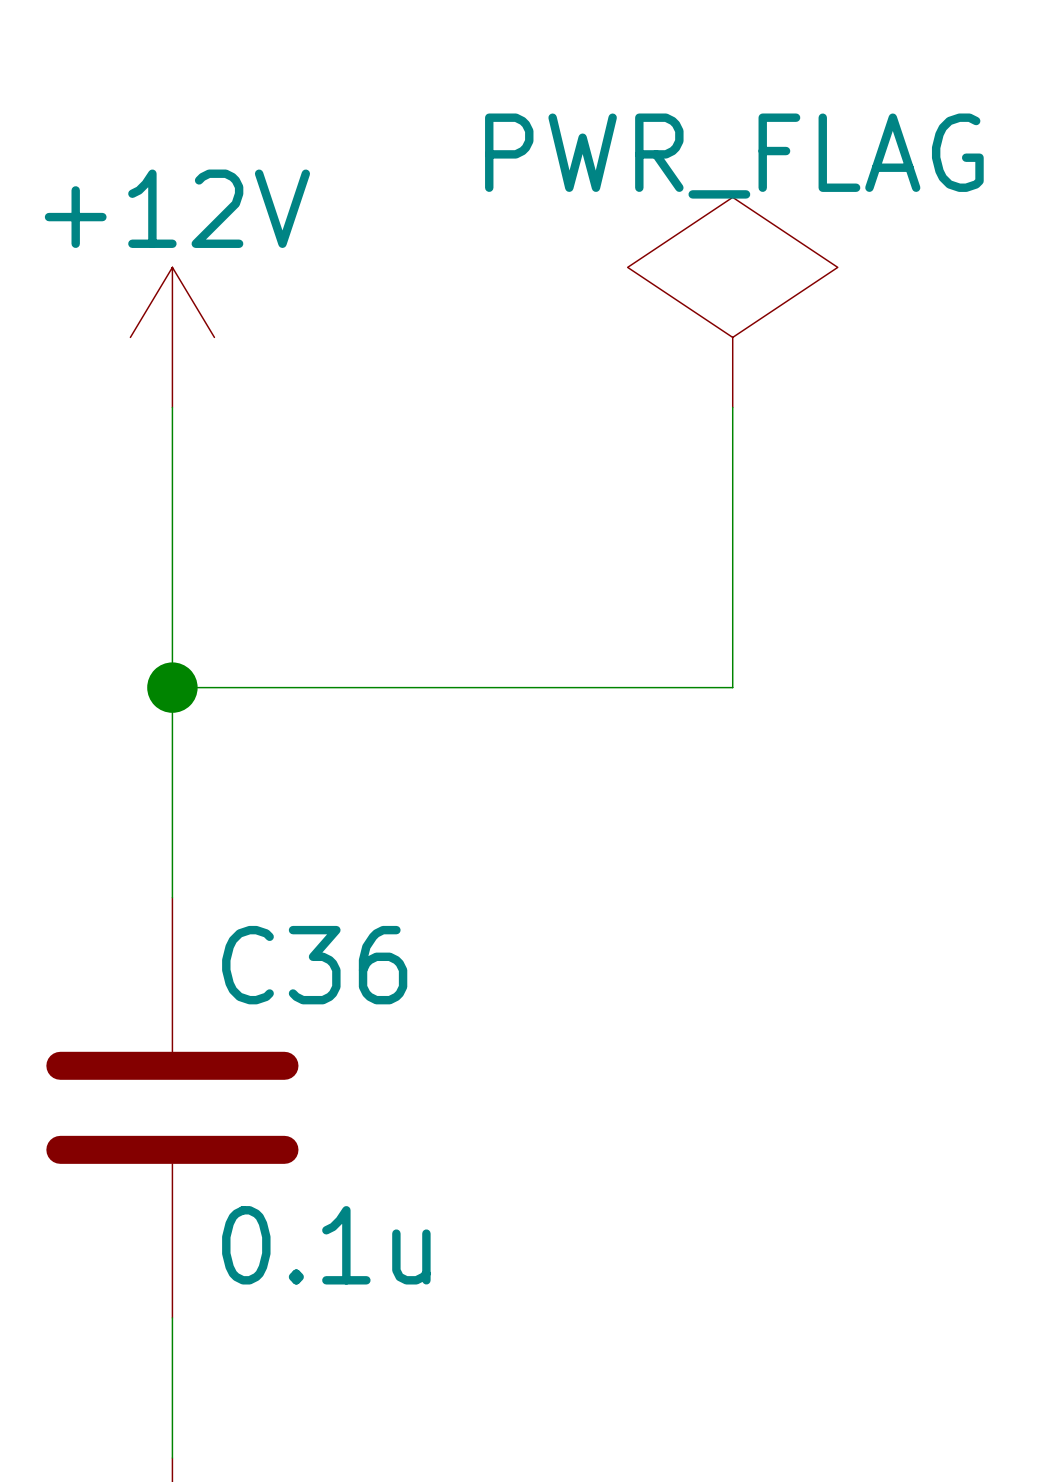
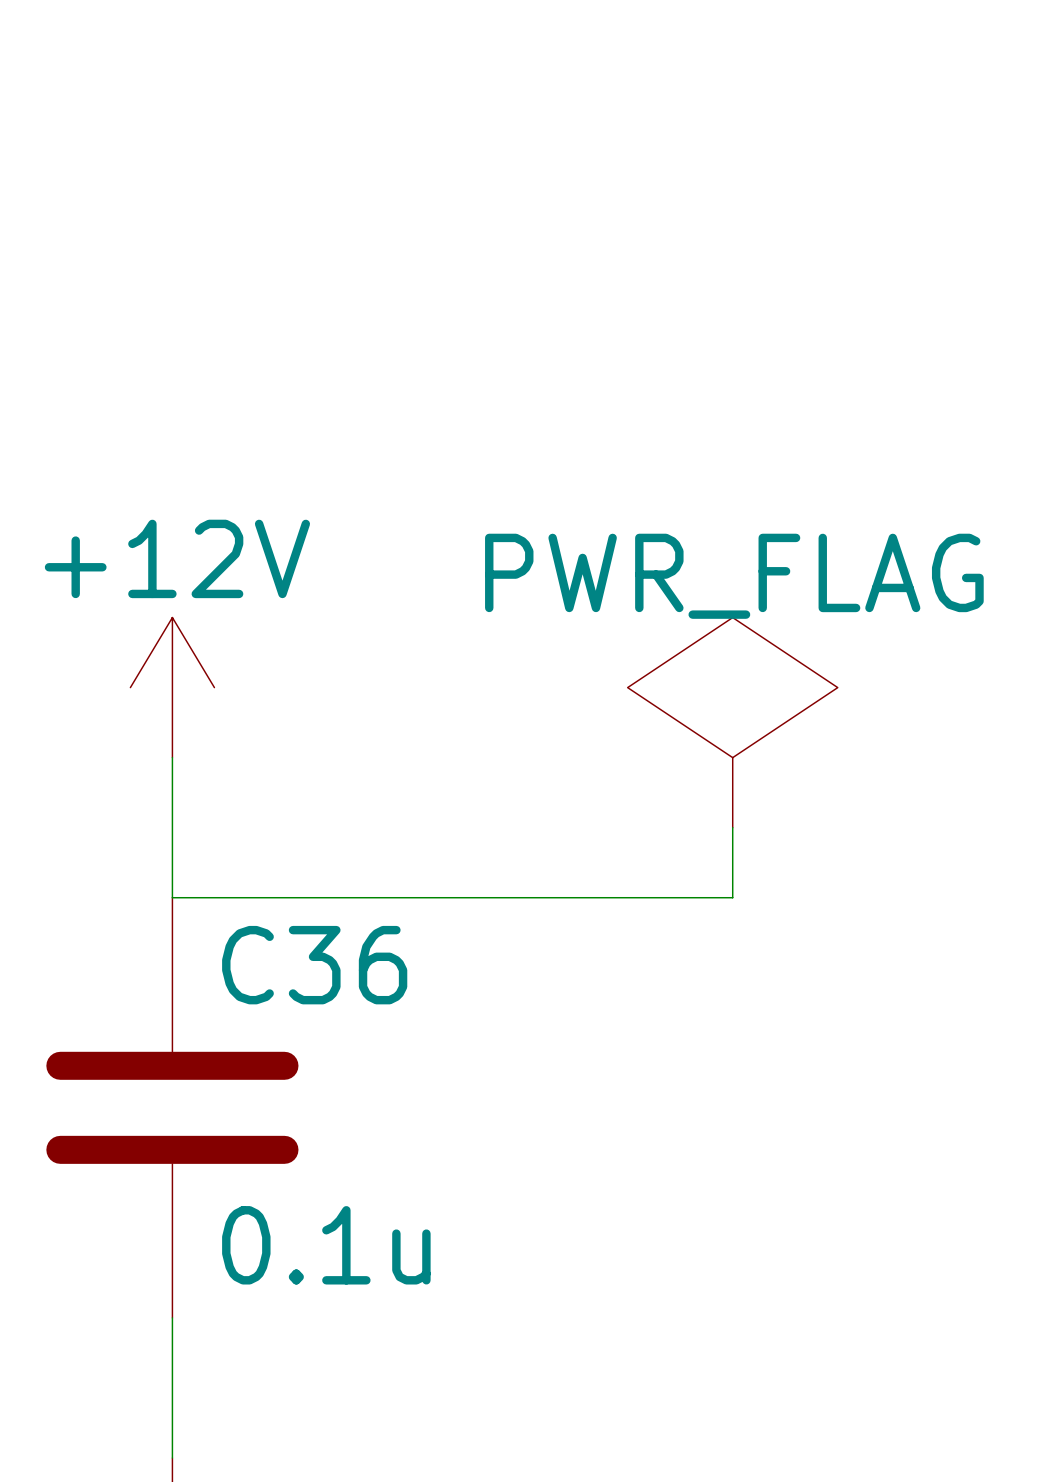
power symbol position: PWR_FLAG (732, 302) -> PWR_FLAG (732, 722)
power symbol position: +12V (172, 337) -> +12V (172, 687)
wire: (172, 407) (172, 757) -> none
wire: (732, 407) (732, 687) (172, 687) -> none
junction: (172, 687) -> none
wire: none -> (732, 827) (732, 897) (172, 897)

